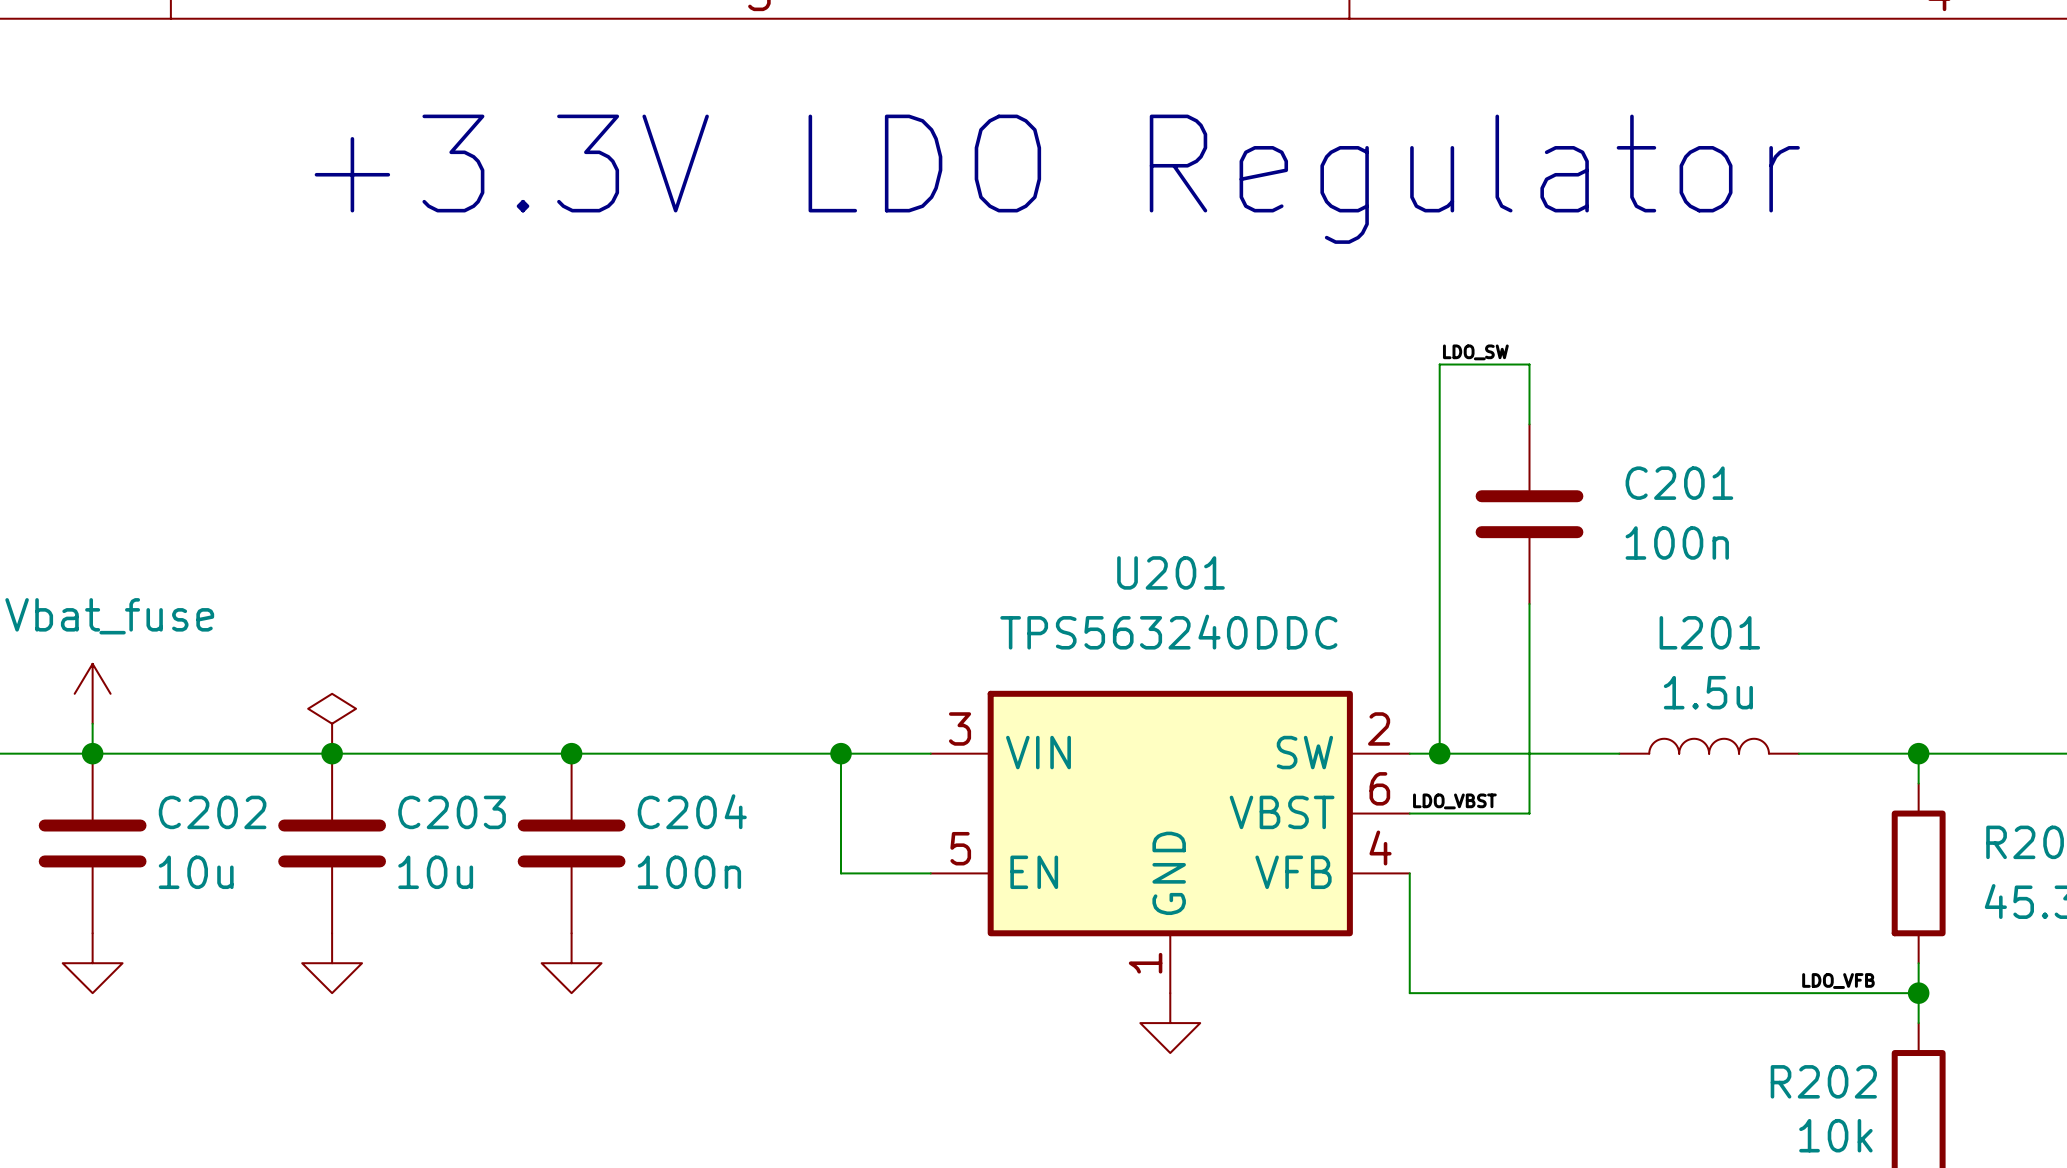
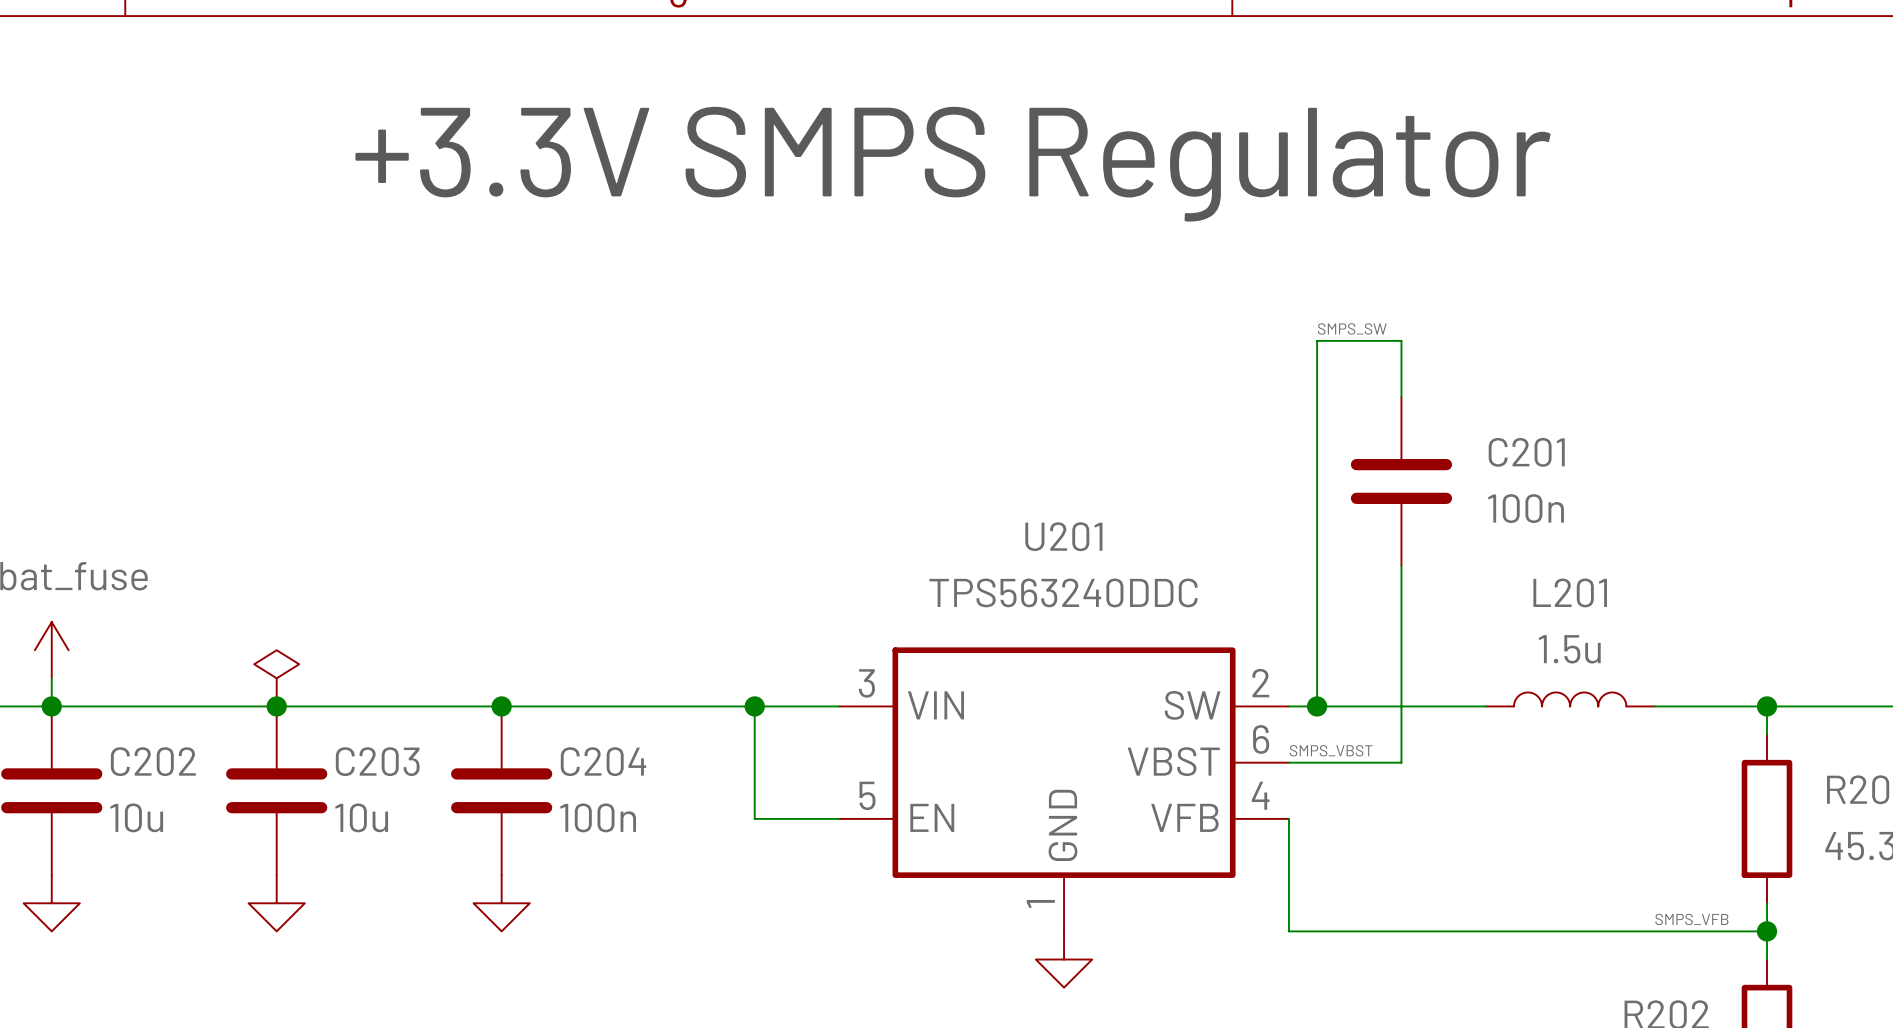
text: +3.3V LDO Regulator (1057, 179) -> +3.3V SMPS Regulator (953, 164)
label: LDO_SW (1475, 352) -> SMPS_SW (1352, 328)
label: LDO_VBST (1454, 801) -> SMPS_VBST (1331, 750)
label: LDO_VFB (1838, 981) -> SMPS_VFB (1691, 919)

